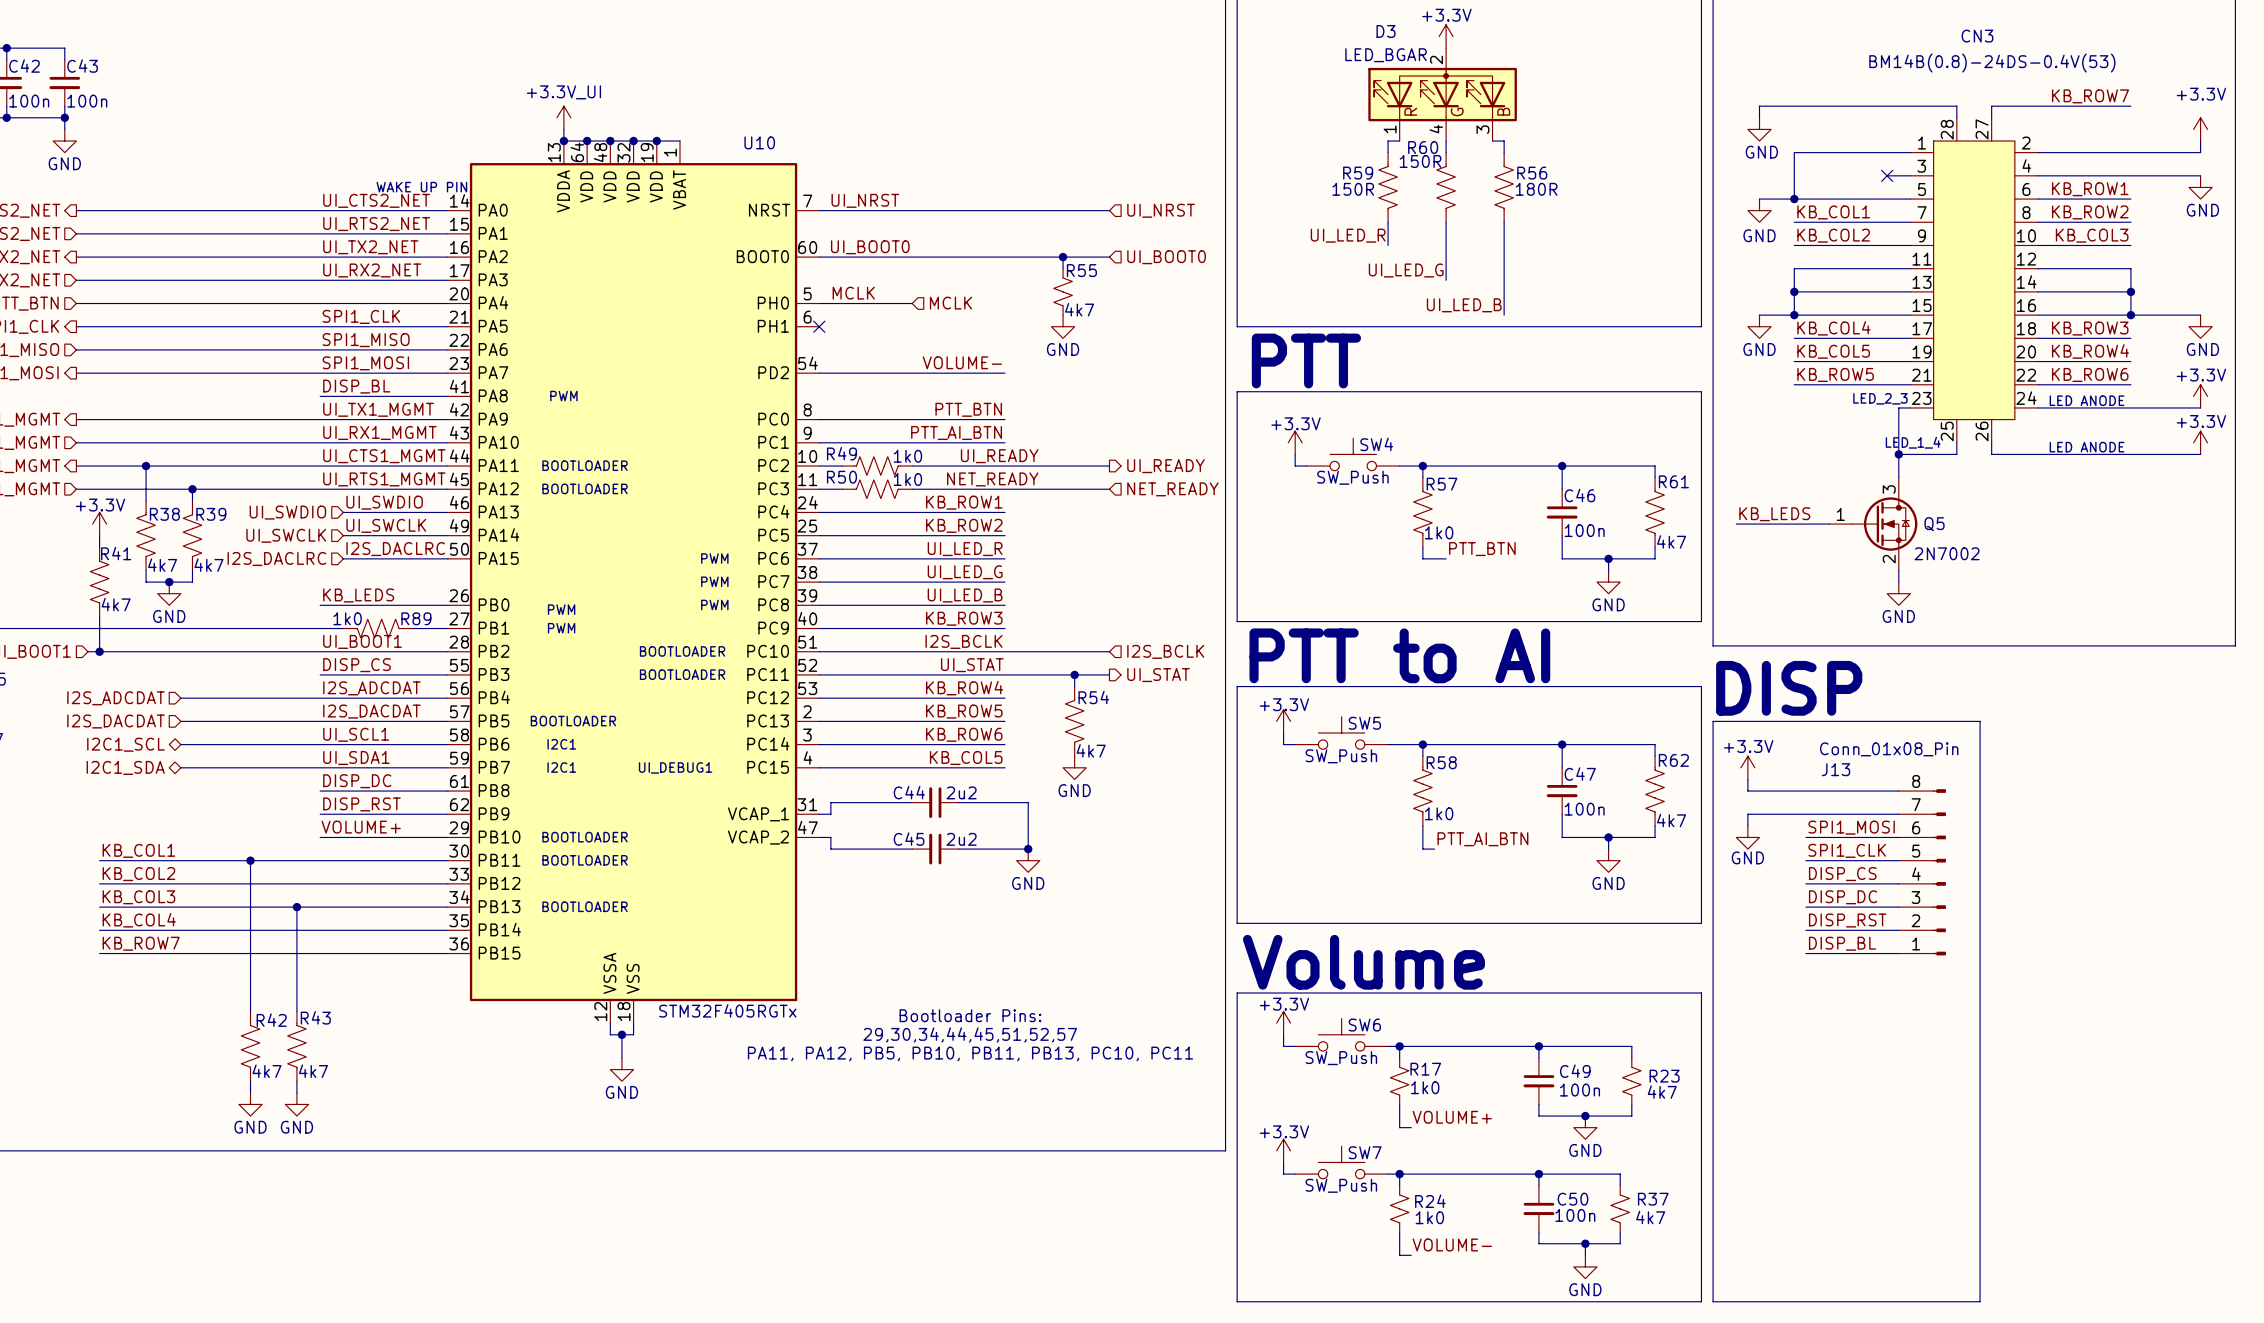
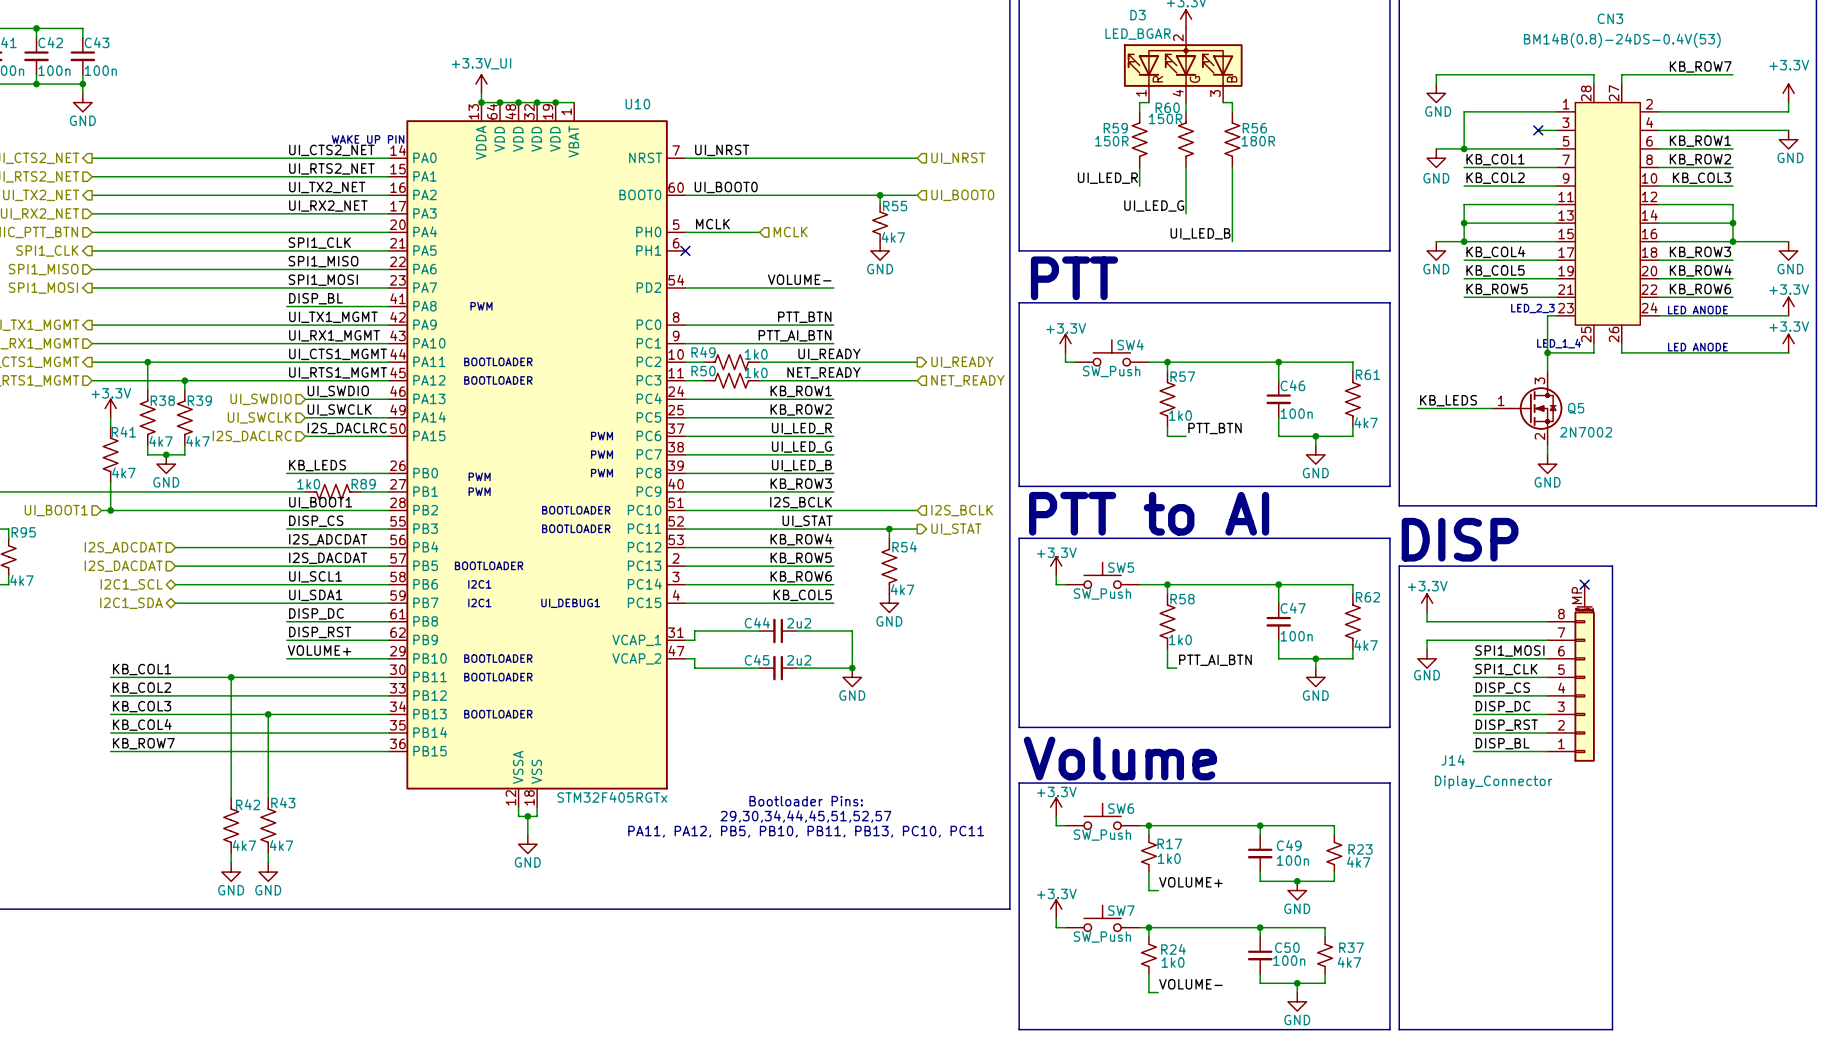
no-connect mark: none -> (1584, 584)
J14: none -> Diplay_Connector (1571, 673)
J13: Conn_01x08_Pin (1922, 872) -> none

